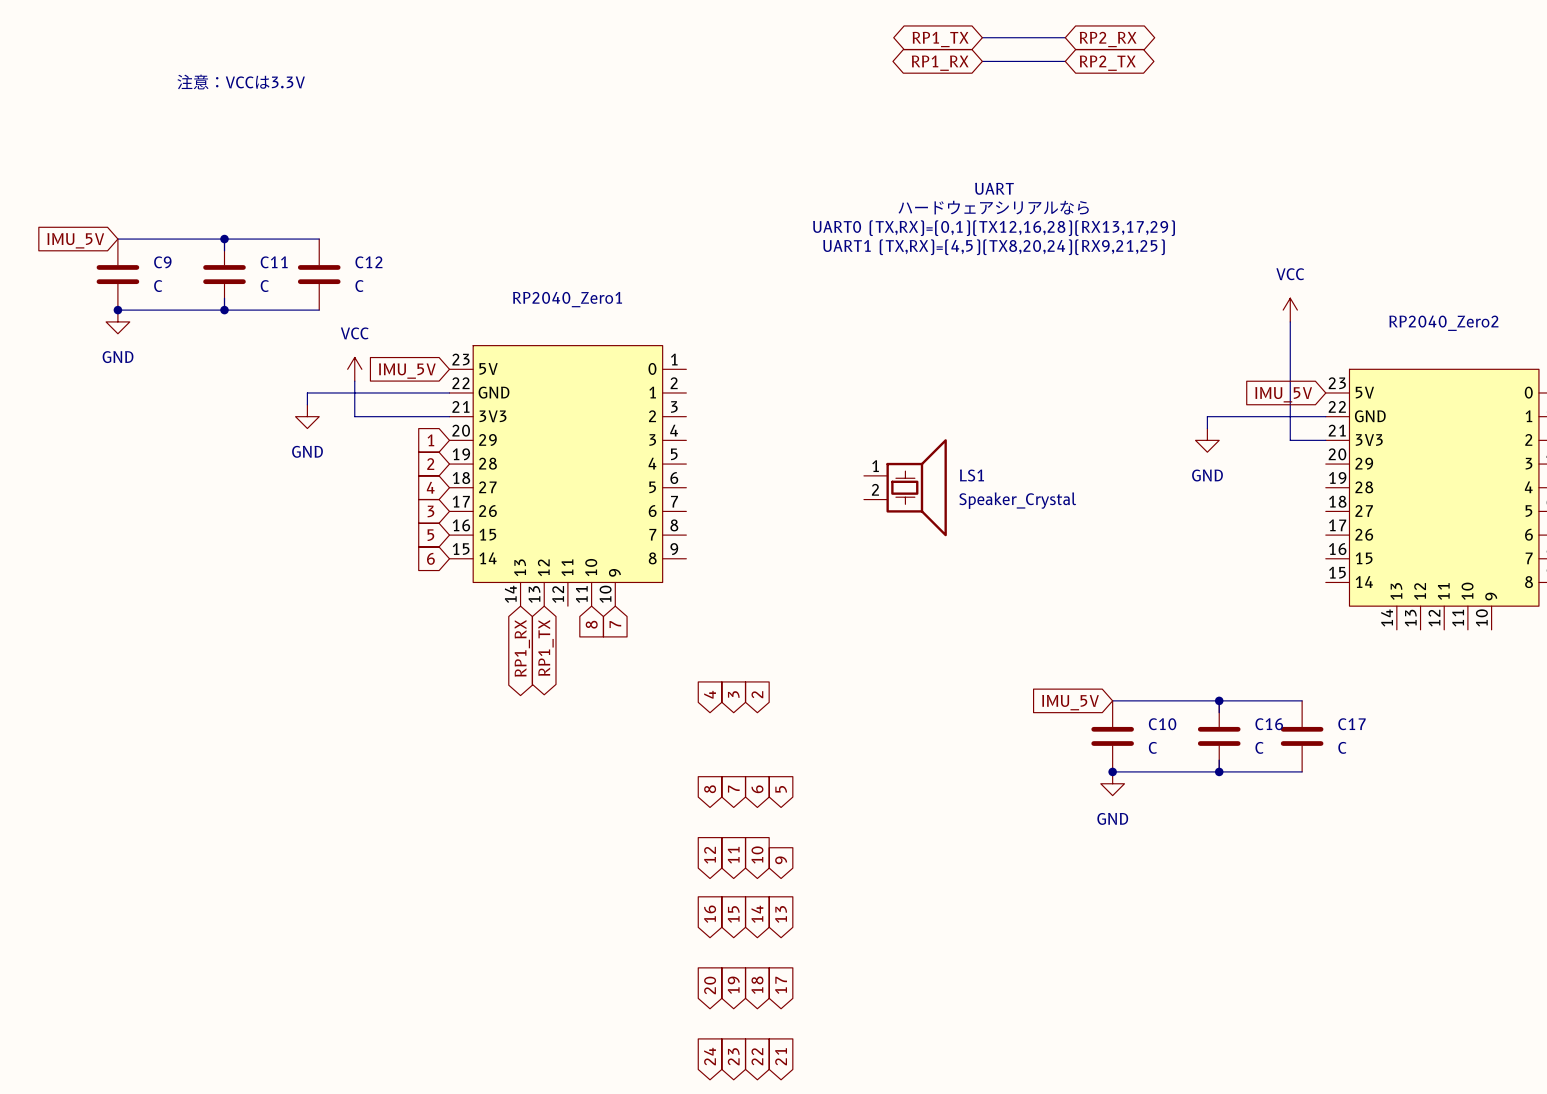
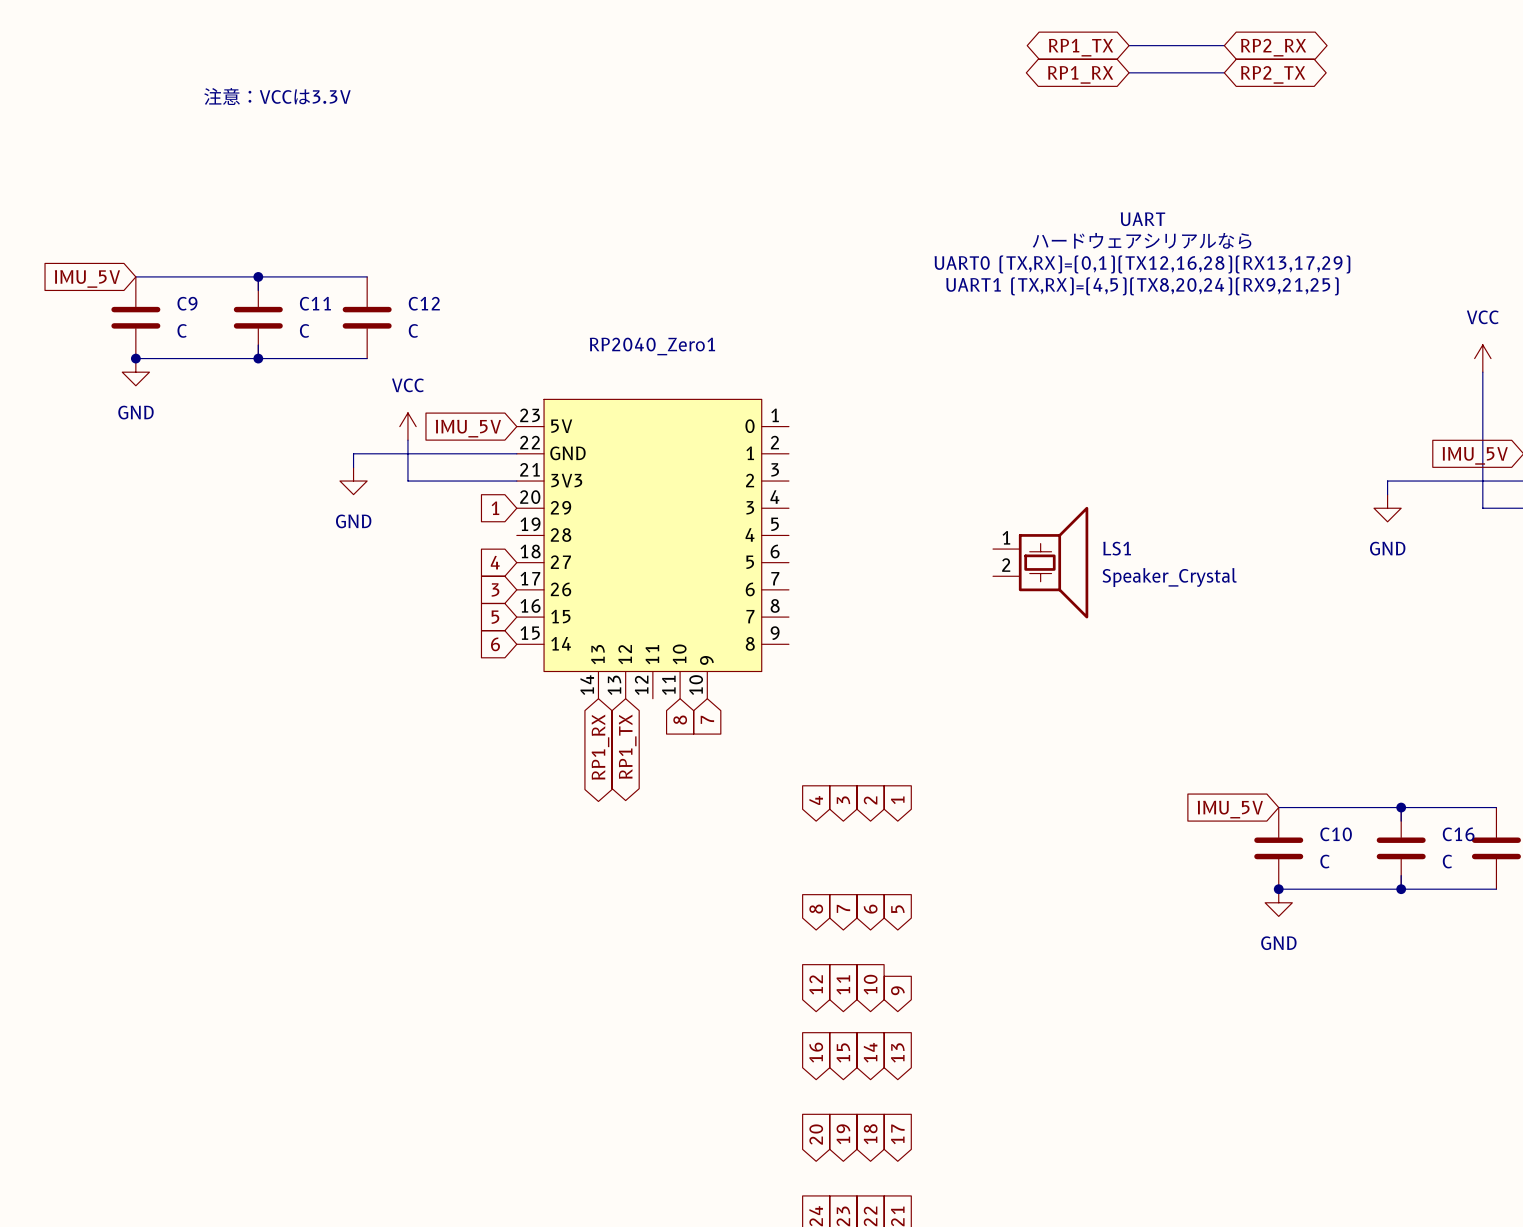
global label: 2 (430, 464) -> none
global label: none -> 1 (897, 800)

